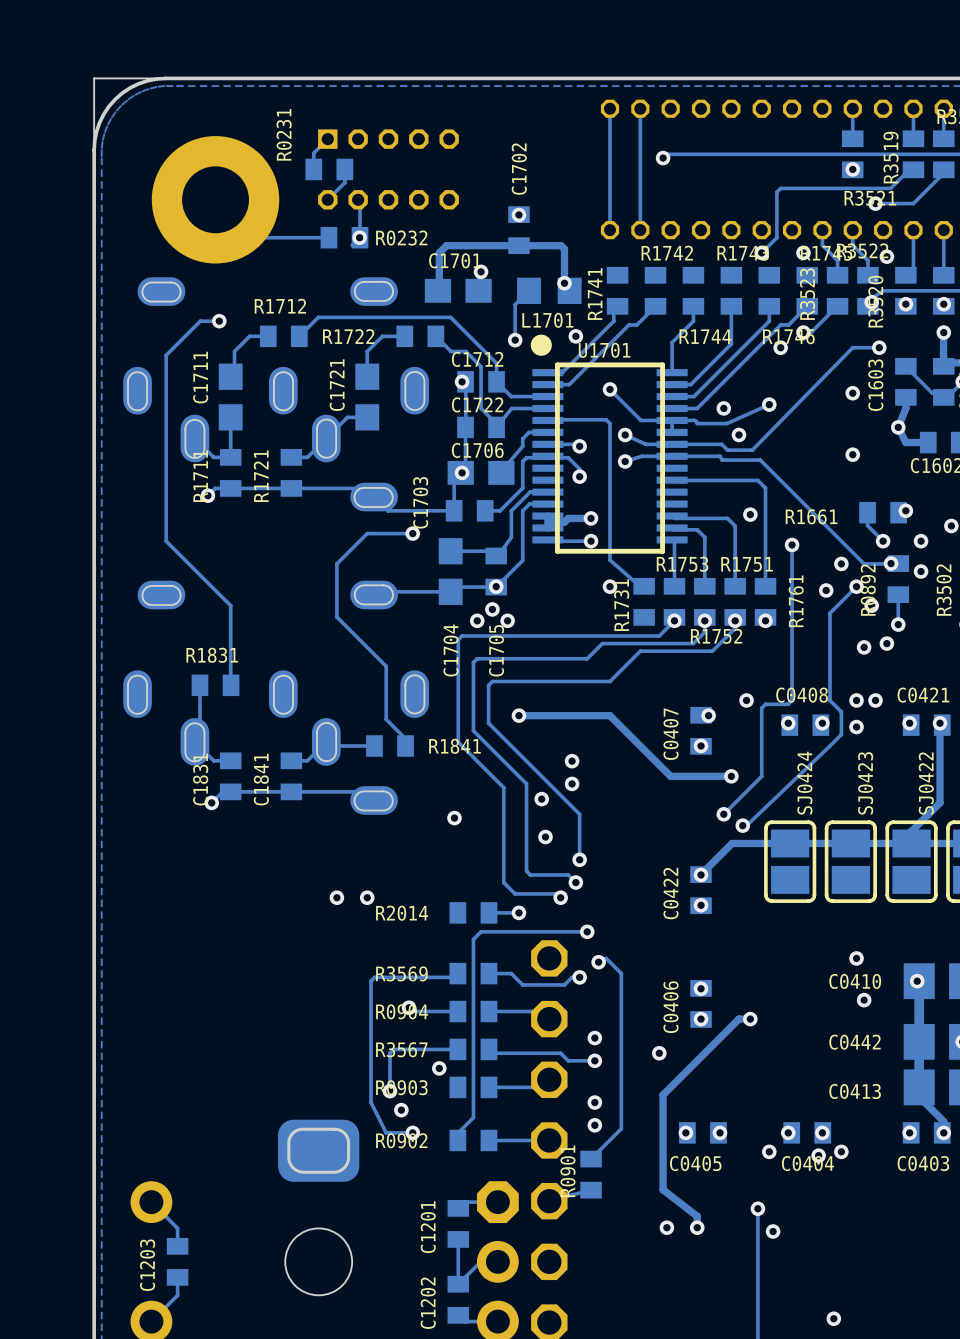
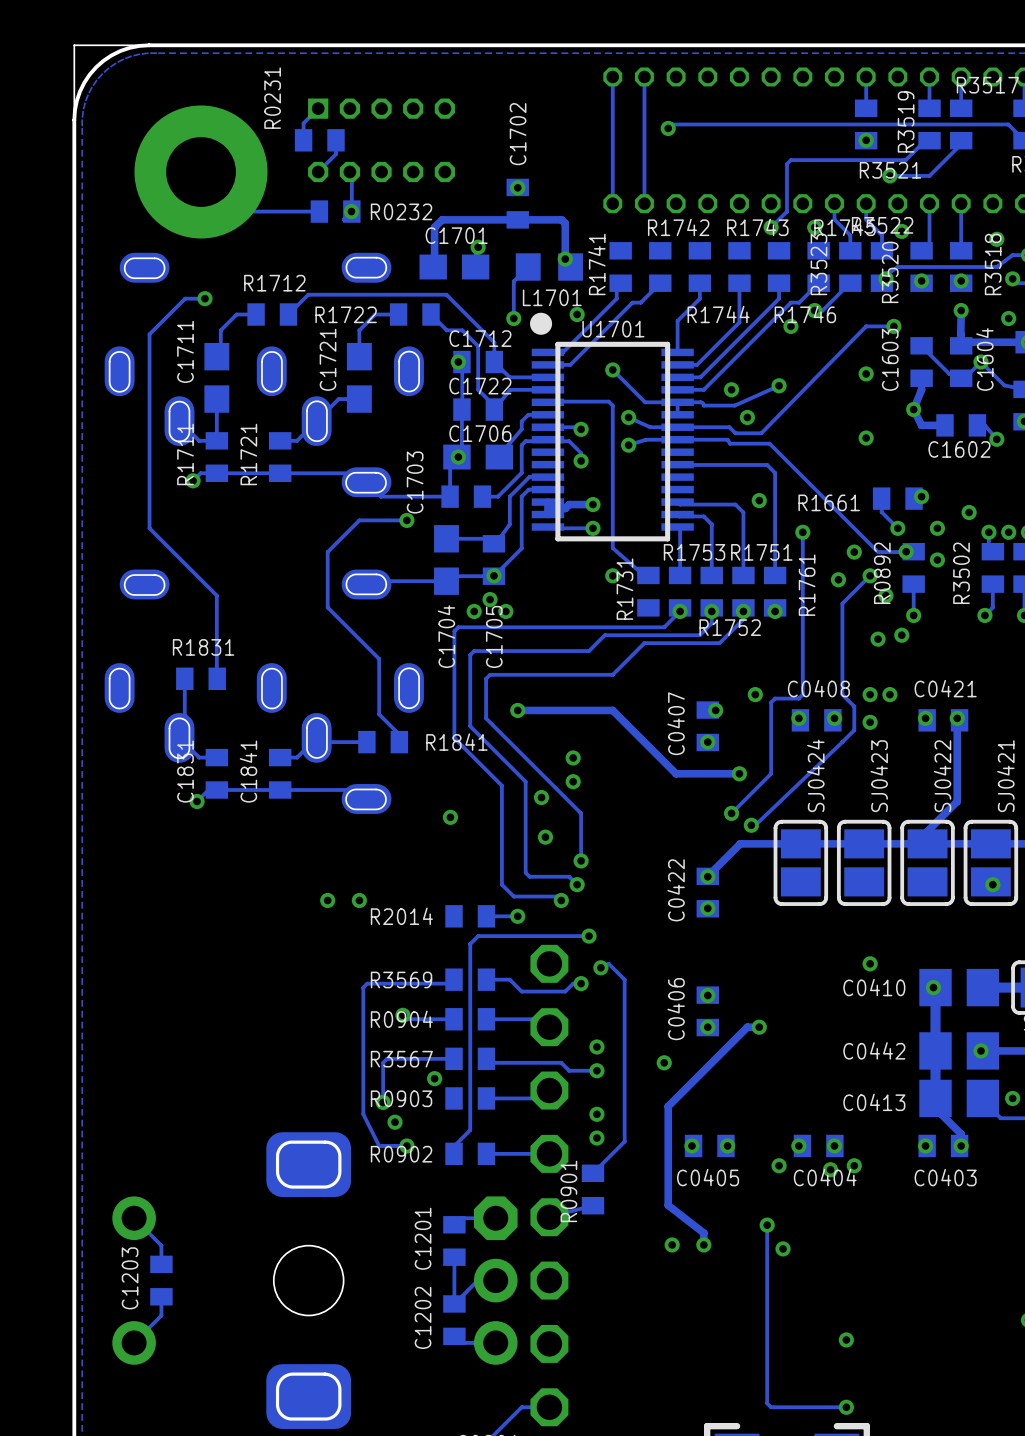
via: (864, 1000) -> none

